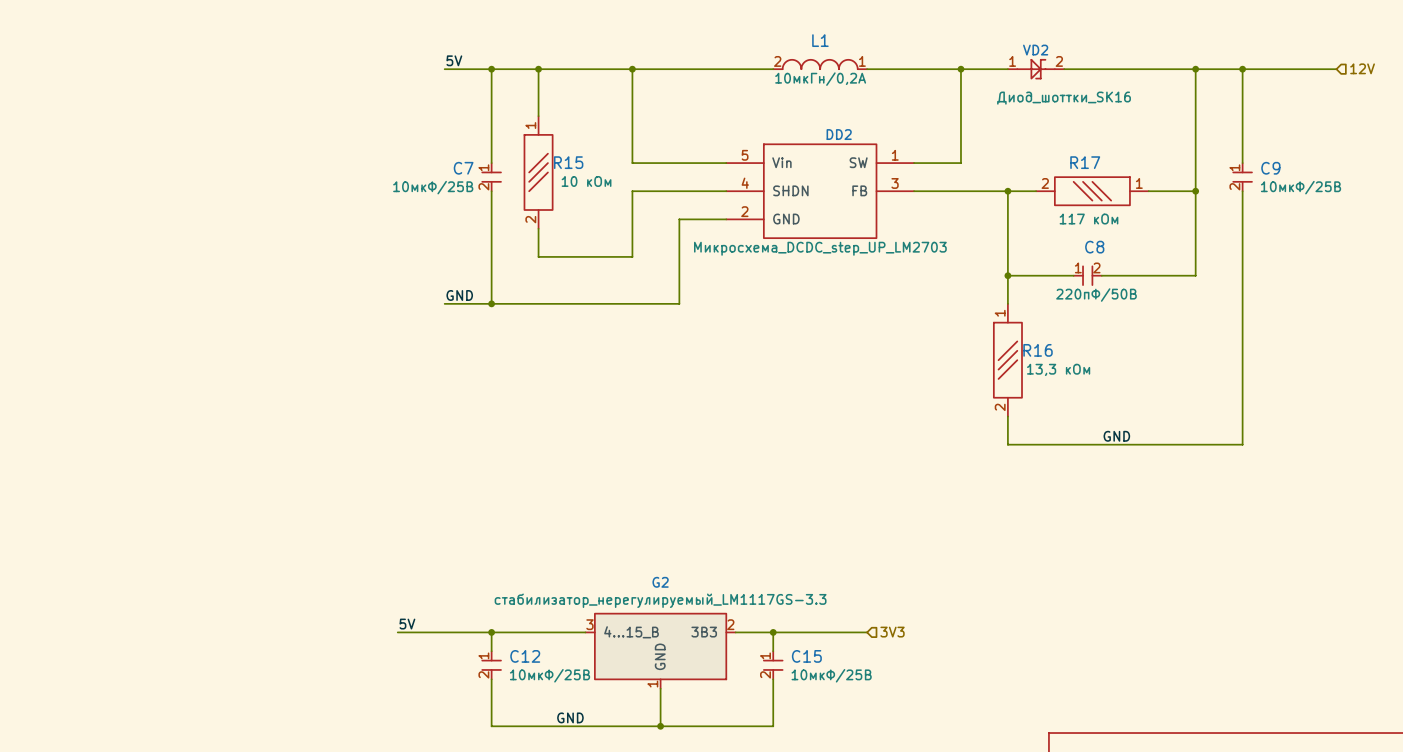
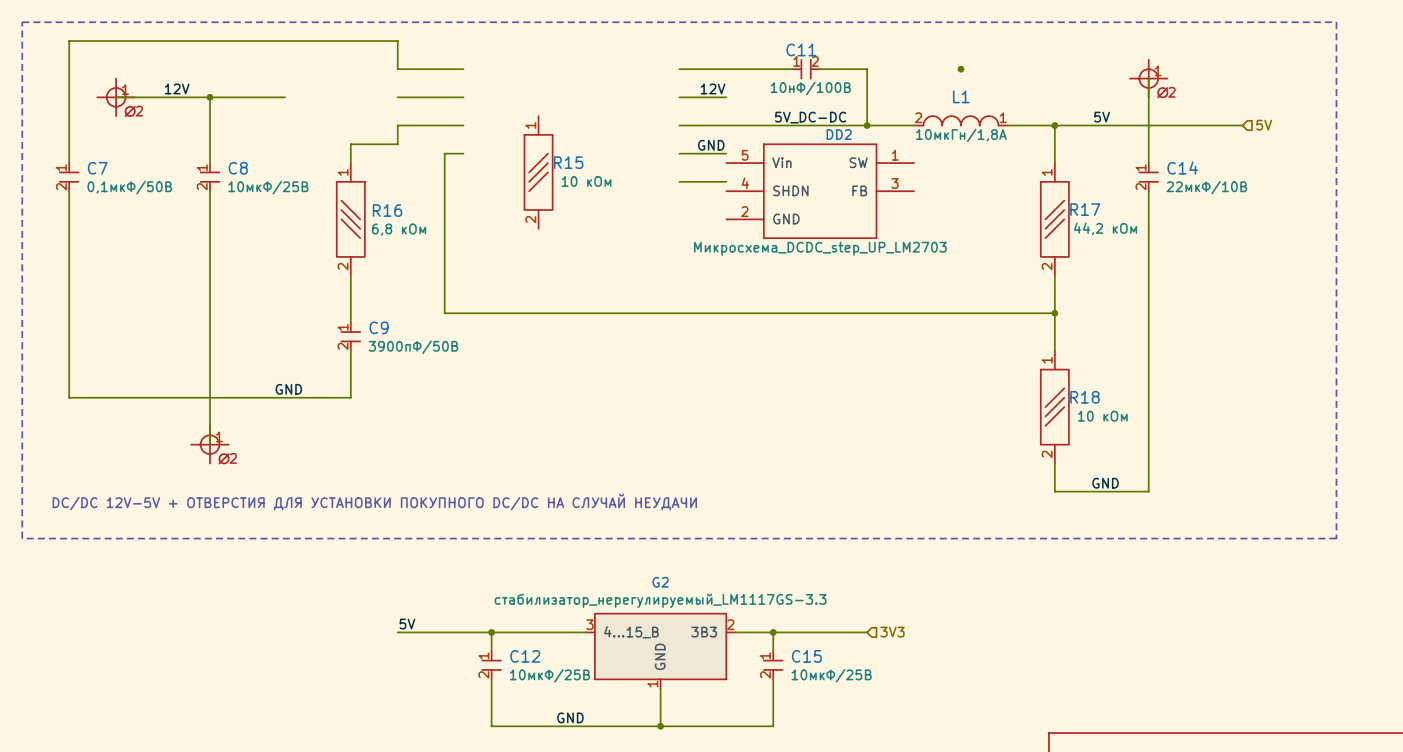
line: none -> (22, 22) (1336, 22) (1336, 538) (22, 538) (22, 22)
label: 5V (454, 60) -> none
L1 position: (820, 64) -> (960, 120)
hierarchical label: 12V (1362, 68) -> none
wire: none -> (444, 69) (397, 69) (397, 41) (69, 41) (69, 163)
wire: (463, 69) (679, 69) -> none
wire: (491, 69) (491, 163) -> none
junction: (491, 69) -> none
wire: (538, 69) (538, 116) -> none
junction: (538, 69) -> none
wire: (632, 69) (632, 163) (726, 163) -> none
junction: (632, 69) -> none
C11: none -> (806, 69)
wire: none -> (820, 69) (867, 69) (867, 125)
wire: (867, 69) (1007, 69) -> none
wire: (960, 69) (960, 163) (914, 163) -> none
VD2: Диод_шоттки_SK16 (1036, 69) -> none
wire: (1064, 69) (1336, 69) -> none
wire: (1195, 69) (1195, 275) (1101, 275) -> none
junction: (1195, 69) -> none
wire: (1242, 69) (1242, 163) -> none
junction: (1242, 69) -> none
wire: none -> (1148, 78) (1148, 163)
part: none -> (1148, 78)
L1 text: 10мкГн/0,2А (820, 79) -> 10мкГн/1,8А (961, 135)
label: none -> 12V (177, 88)
label: none -> 12V (713, 88)
wire: none -> (116, 97) (285, 97)
part: none -> (116, 97)
wire: none -> (209, 97) (209, 163)
junction: none -> (209, 97)
wire: none -> (397, 97) (463, 97)
wire: none -> (679, 97) (726, 97)
label: none -> 5V_DC-DC (810, 117)
label: none -> 5V (1102, 117)
wire: none -> (463, 125) (397, 125) (397, 144) (350, 144) (350, 163)
wire: none -> (679, 125) (914, 125)
junction: none -> (867, 125)
wire: none -> (1007, 125) (1242, 125)
wire: none -> (1054, 125) (1054, 163)
junction: none -> (1054, 125)
hierarchical label: none -> 5V (1264, 125)
label: none -> GND (711, 145)
wire: none -> (463, 153) (444, 153) (444, 313) (1054, 313)
wire: none -> (679, 153) (726, 153)
R17 name position: R17 (1085, 162) -> R17 (1085, 209)
C7 name position: C7 (463, 168) -> C7 (97, 168)
C7 position: (491, 177) -> (69, 177)
C14: none -> (1148, 177)
C9 position: (1242, 177) -> (350, 336)
wire: none -> (679, 181) (726, 181)
C7 text: 10мкФ/25В (433, 187) -> 0,1мкФ/50В (129, 187)
C9 text: 10мкФ/25В (1300, 187) -> 3900пФ/50В (413, 347)
wire: none -> (69, 191) (69, 397) (350, 397) (350, 350)
wire: none -> (209, 191) (209, 444)
wire: (491, 191) (491, 303) -> none
wire: (726, 191) (632, 191) (632, 256) (538, 256) (538, 228) -> none
wire: (914, 191) (1036, 191) -> none
wire: (1007, 191) (1007, 303) -> none
junction: (1007, 191) -> none
R17 rotation: 0° (1092, 191) -> 90° counterclockwise (1054, 219)
wire: (1148, 191) (1195, 191) -> (1148, 191) (1148, 491) (1054, 491) (1054, 463)
junction: (1195, 191) -> none
wire: (1242, 191) (1242, 444) (1007, 444) (1007, 416) -> none
wire: (726, 219) (679, 219) (679, 303) (444, 303) -> none
R17 text: 117 кОм (1088, 219) -> 44,2 кОм (1105, 228)
C8 name position: C8 (1094, 247) -> C8 (238, 168)
wire: none -> (350, 275) (350, 322)
wire: (1007, 275) (1073, 275) -> none
junction: (1007, 275) -> none
wire: none -> (1054, 275) (1054, 350)
C8 rotation: 0° (1087, 275) -> 90° clockwise (209, 177)
C8 position: (1087, 275) -> (209, 177)
label: GND (459, 295) -> none
C8 text: 220пФ/50В (1096, 295) -> 10мкФ/25В (268, 187)
junction: (491, 303) -> none
junction: none -> (1054, 313)
R16 flip: as is (1007, 360) -> left-right (350, 219)
R16 position: (1007, 360) -> (350, 219)
R16 text: 13,3 кОм (1058, 369) -> 6,8 кОм (399, 229)
label: none -> GND (288, 389)
R18: none -> (1054, 407)
label position: GND (1116, 436) -> GND (1105, 483)
part: none -> (209, 444)
text: none -> DC/DC 12V-5V + ОТВЕРСТИЯ ДЛЯ УСТАНОВКИ ПОКУПНОГО DC/DC НА СЛУЧАЙ НЕУДАЧИ (374, 502)

